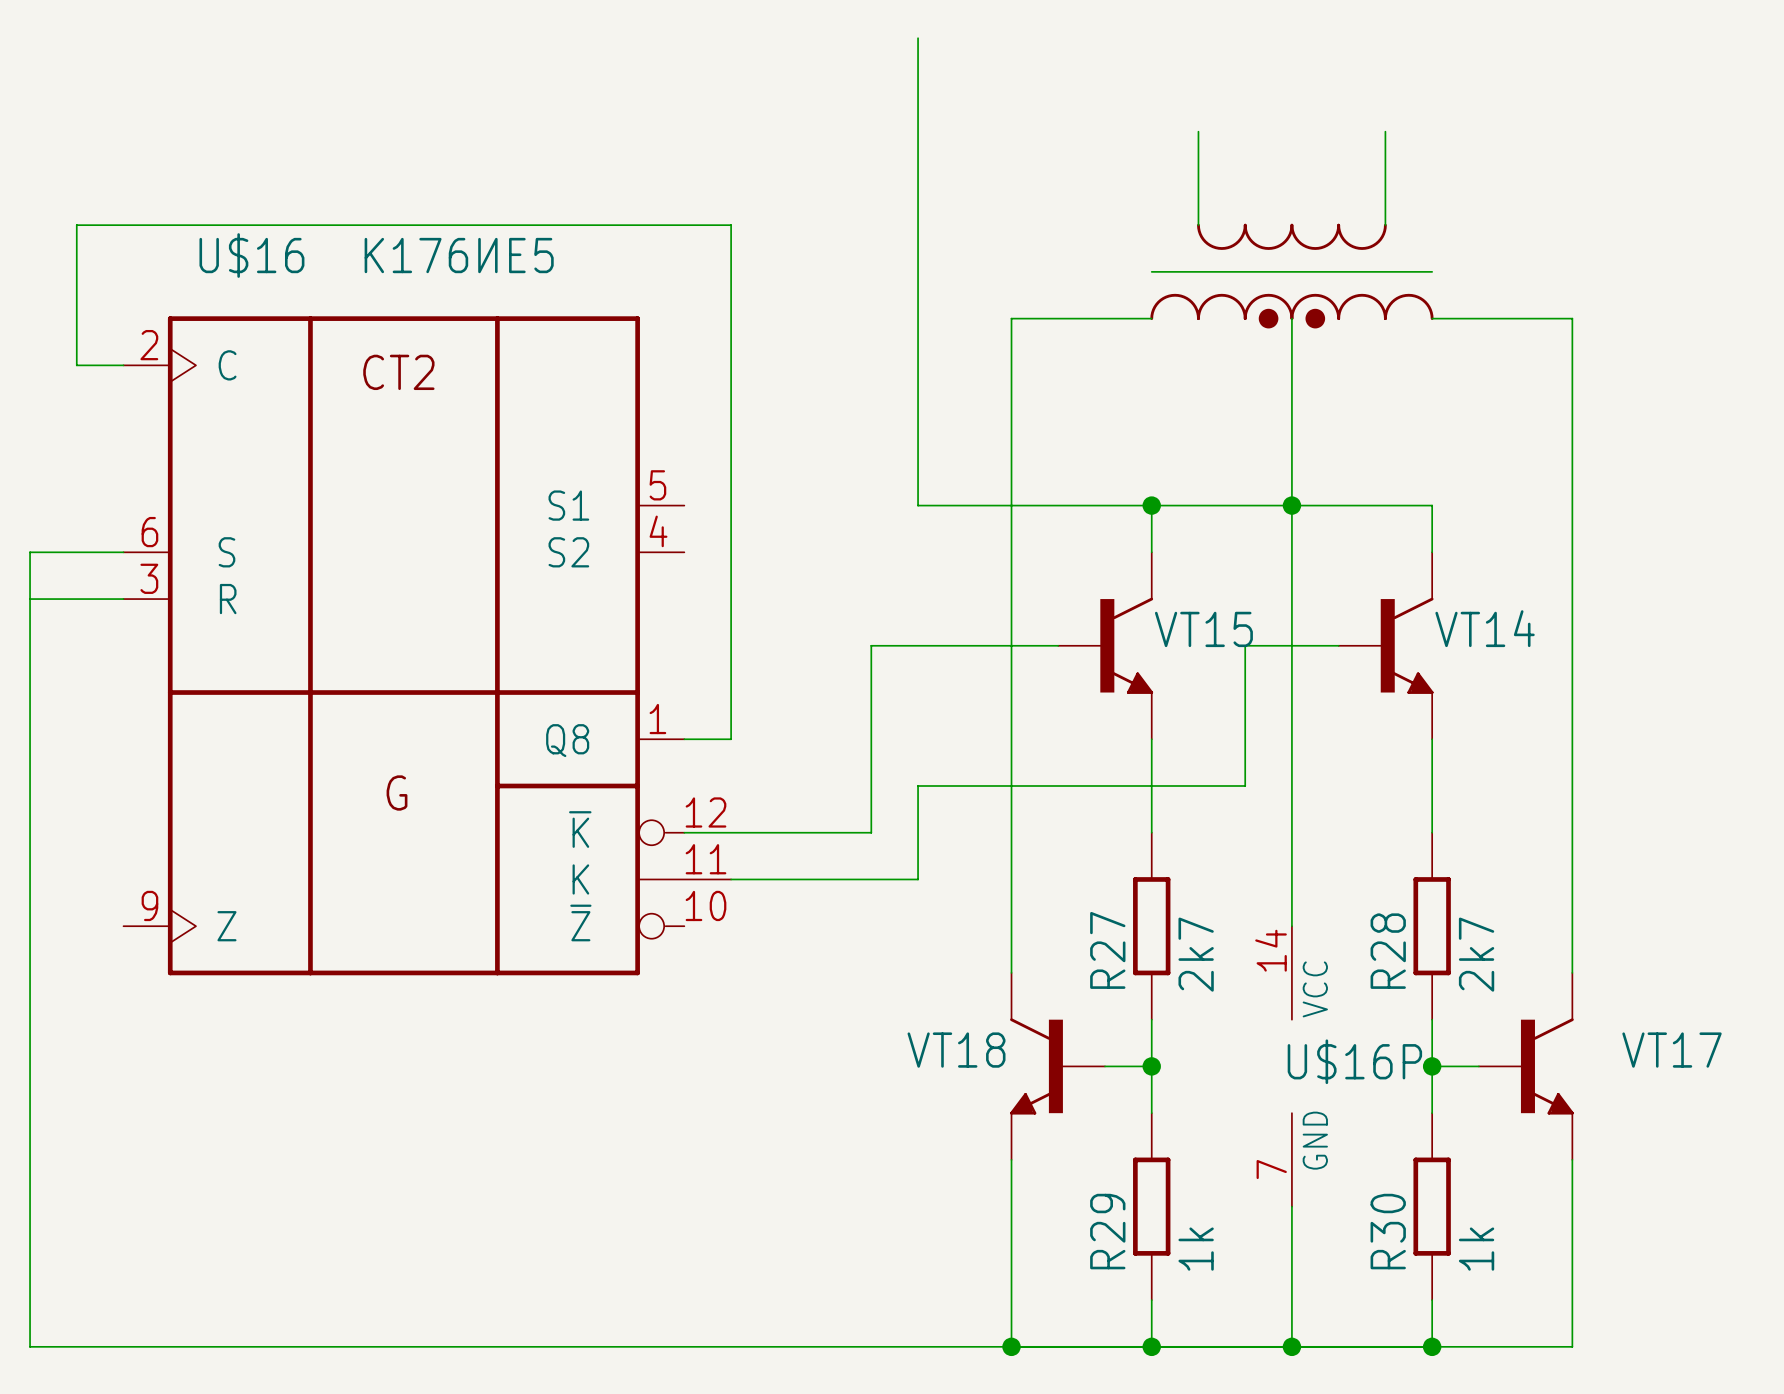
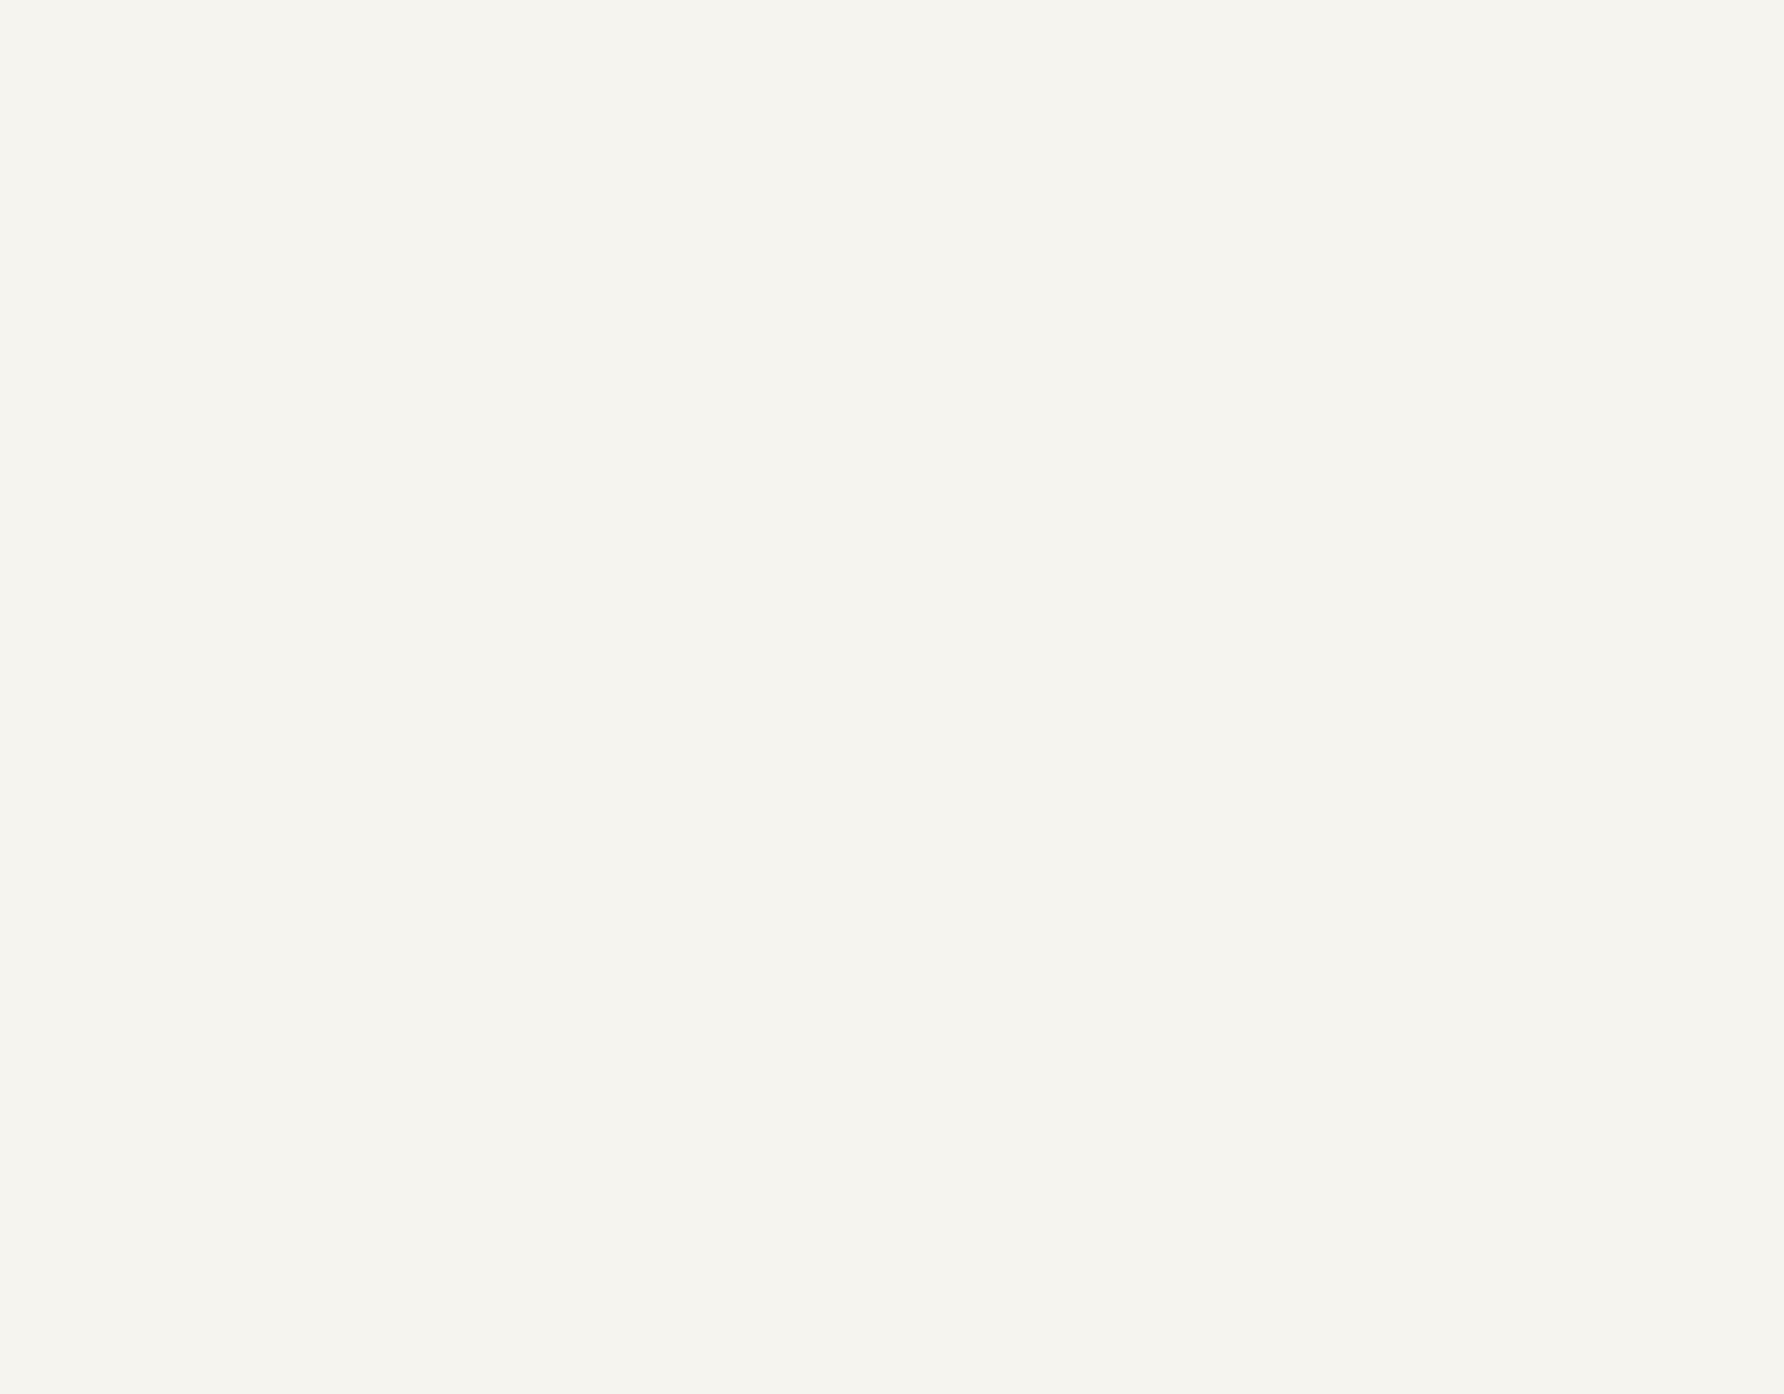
wire: (918, 38) (918, 505) (1432, 505) (1432, 552) -> none
wire: (1198, 131) (1198, 225) -> none
wire: (1385, 131) (1385, 225) -> none
line: (1198, 225) (1200, 234) (1205, 241) (1212, 246) (1221, 248) (1230, 246) (1238, 241) (1243, 234) (1245, 225) (1250, 239) (1256, 245) (1265, 248) (1274, 247) (1282, 243) (1288, 236) (1291, 225) (1296, 239) (1309, 247) (1318, 248) (1329, 243) (1335, 236) (1338, 225) (1341, 236) (1347, 243) (1355, 247) (1365, 248) (1373, 245) (1380, 239) (1385, 225) -> none
wire: (1151, 271) (1432, 271) -> none
drawing: [1258, 308, 1279, 329] -> none
drawing: [1305, 308, 1326, 329] -> none
line: (1151, 318) (1153, 309) (1158, 302) (1166, 297) (1175, 295) (1184, 297) (1191, 302) (1196, 309) (1198, 318) (1203, 304) (1210, 298) (1218, 295) (1227, 296) (1236, 300) (1242, 306) (1245, 318) (1250, 304) (1256, 298) (1265, 295) (1274, 296) (1282, 300) (1288, 306) (1291, 318) (1296, 304) (1303, 298) (1312, 295) (1321, 296) (1329, 300) (1335, 306) (1338, 318) (1343, 304) (1355, 296) (1365, 295) (1376, 300) (1382, 306) (1385, 318) (1388, 306) (1394, 300) (1402, 296) (1411, 295) (1420, 298) (1427, 304) (1432, 318) -> none
wire: (1151, 318) (1011, 318) (1011, 972) -> none
wire: (1291, 318) (1291, 926) -> none
wire: (1432, 318) (1572, 318) (1572, 972) -> none
wire: (123, 365) (76, 365) (76, 225) (731, 225) (731, 739) (684, 739) -> none
wire: (1151, 505) (1151, 552) -> none
junction: (1151, 505) -> none
junction: (1291, 505) -> none
wire: (123, 552) (30, 552) (30, 1346) (1572, 1346) (1572, 1159) -> none
wire: (30, 599) (123, 599) -> none
U$16: К176ИЕ5 (427, 645) -> none
wire: (1058, 645) (871, 645) (871, 832) (684, 832) -> none
VT15: (1105, 645) -> none
wire: (1338, 645) (1245, 645) (1245, 785) (918, 785) (918, 879) (731, 879) -> none
VT14: (1386, 645) -> none
wire: (1151, 739) (1151, 832) -> none
wire: (1432, 739) (1432, 832) -> none
R27: 2k7 (1151, 926) -> none
R28: 2k7 (1432, 926) -> none
wire: (1151, 1019) (1151, 1113) -> none
wire: (1432, 1019) (1432, 1113) -> none
VT18: (1057, 1066) -> none
wire: (1104, 1066) (1151, 1066) -> none
junction: (1151, 1066) -> none
U$16P: (1291, 1066) -> none
wire: (1432, 1066) (1478, 1066) -> none
junction: (1432, 1066) -> none
VT17: (1526, 1066) -> none
wire: (1011, 1159) (1011, 1346) -> none
R29: 1k (1151, 1206) -> none
wire: (1291, 1206) (1291, 1346) -> none
R30: 1k (1432, 1206) -> none
wire: (1151, 1300) (1151, 1346) -> none
wire: (1432, 1300) (1432, 1346) -> none
junction: (1011, 1346) -> none
junction: (1151, 1346) -> none
junction: (1291, 1346) -> none
junction: (1432, 1346) -> none

